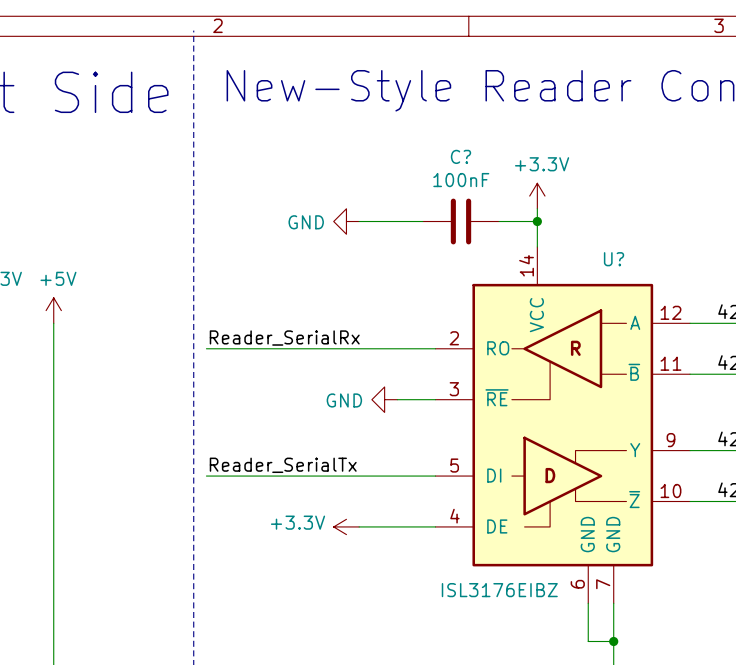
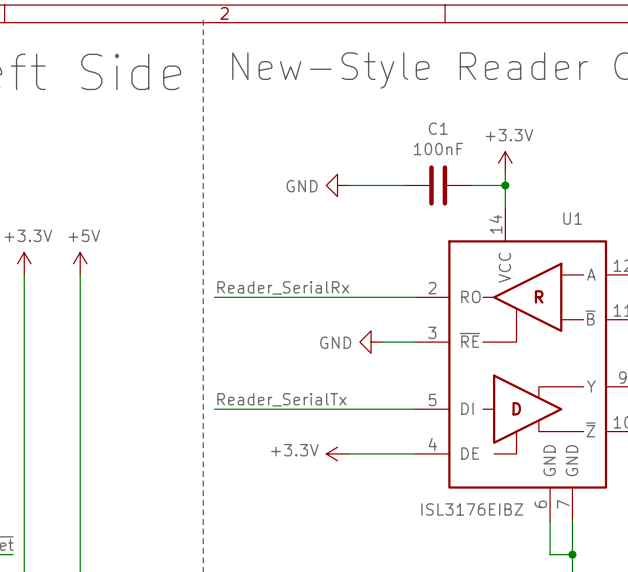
C? name: C? (460, 156) -> C1 (438, 128)
U? name: U? (614, 259) -> U1 (572, 218)

